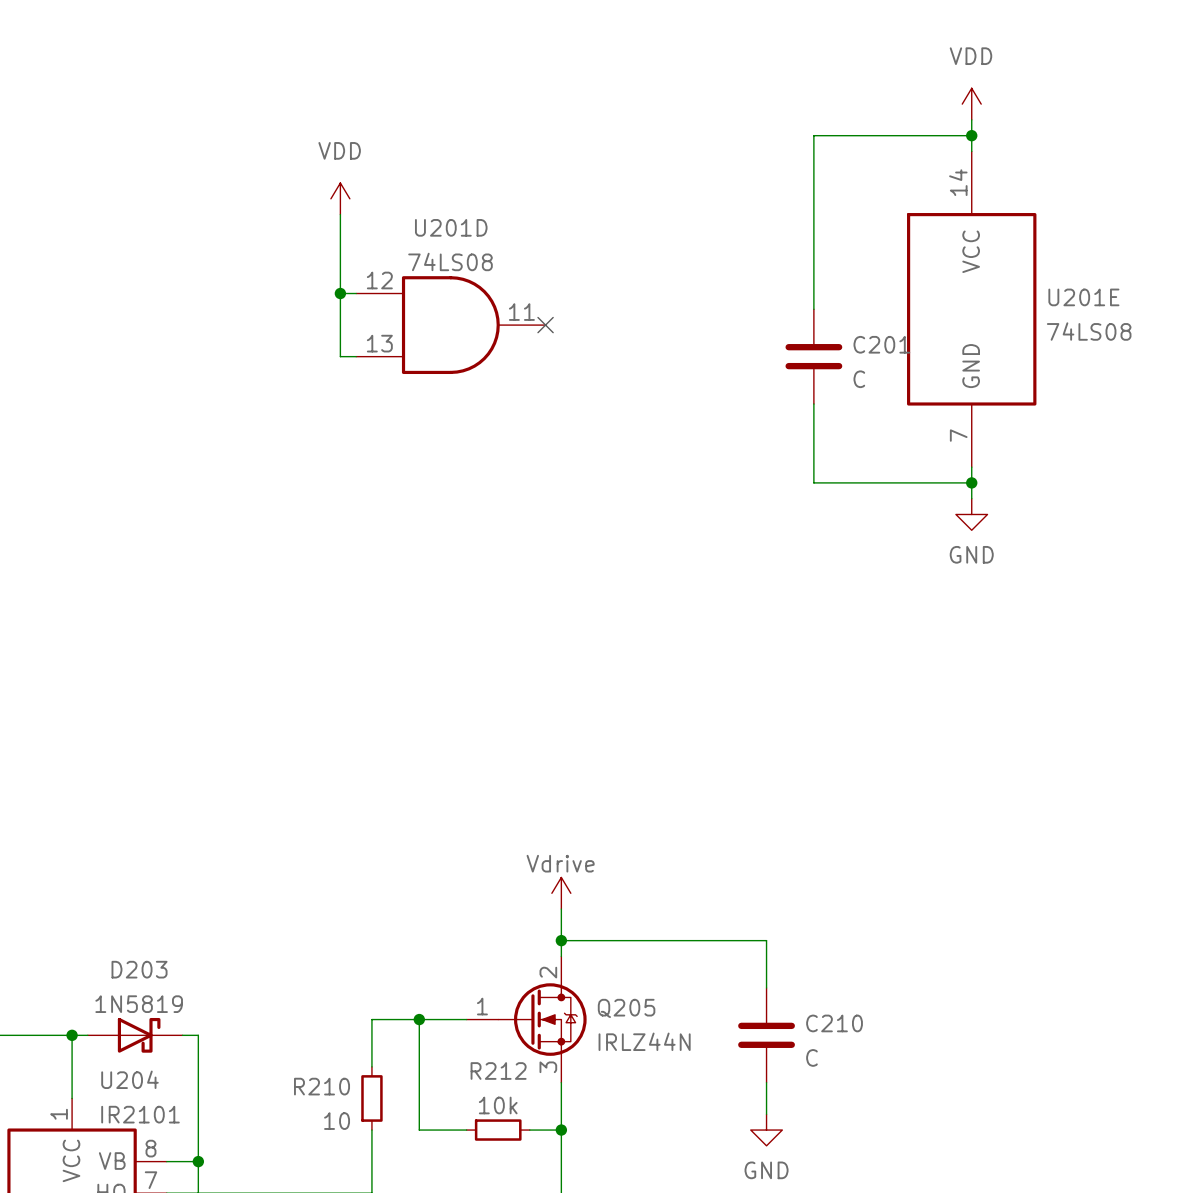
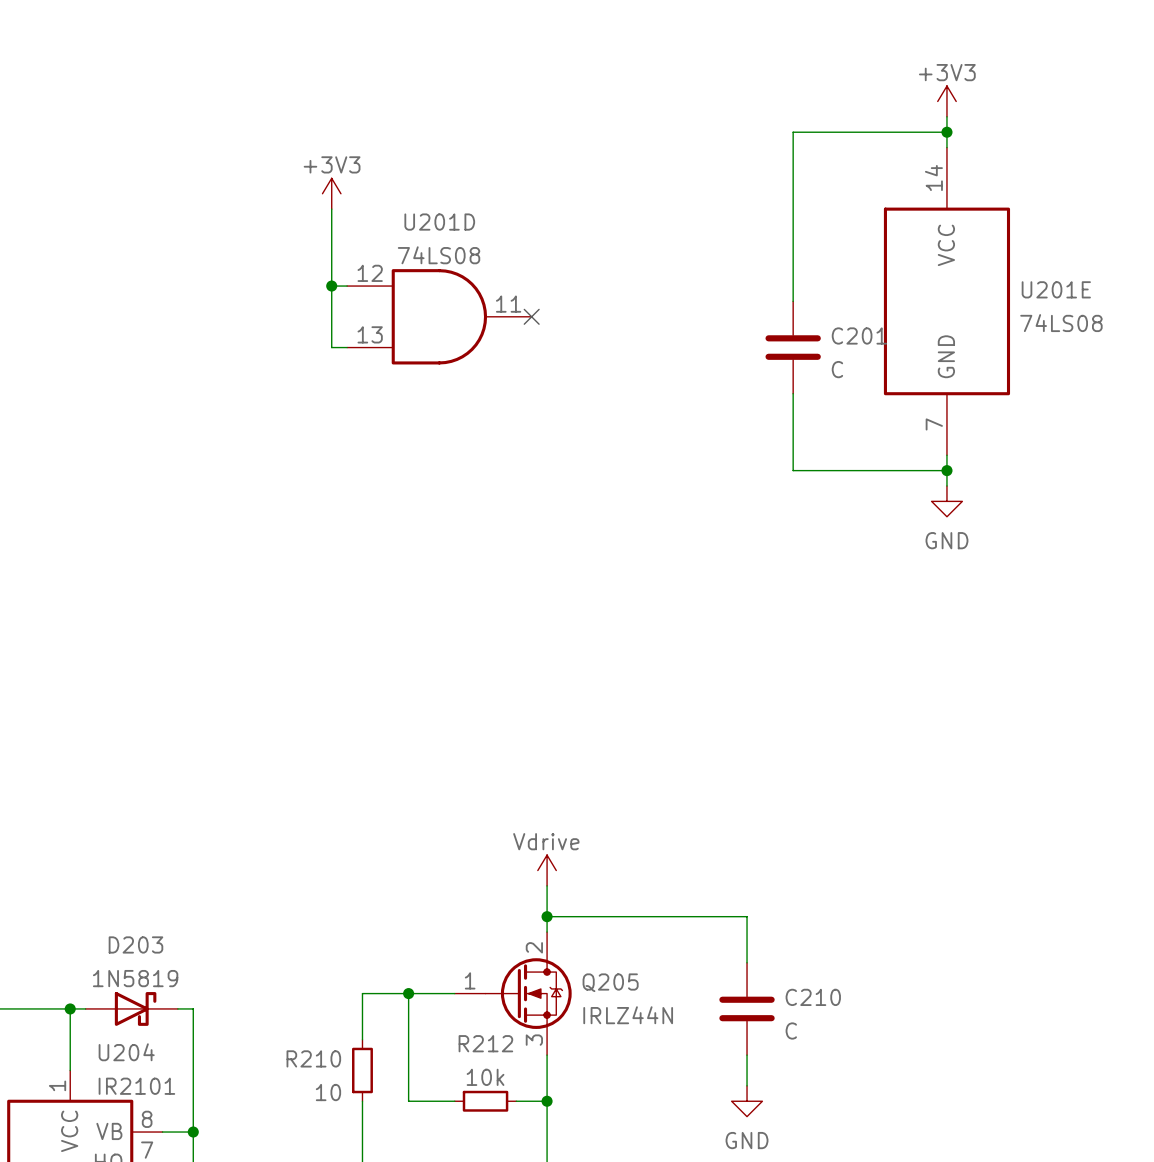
power symbol: VDD (971, 104) -> +3V3 (946, 101)
power symbol: VDD (340, 198) -> +3V3 (331, 193)

